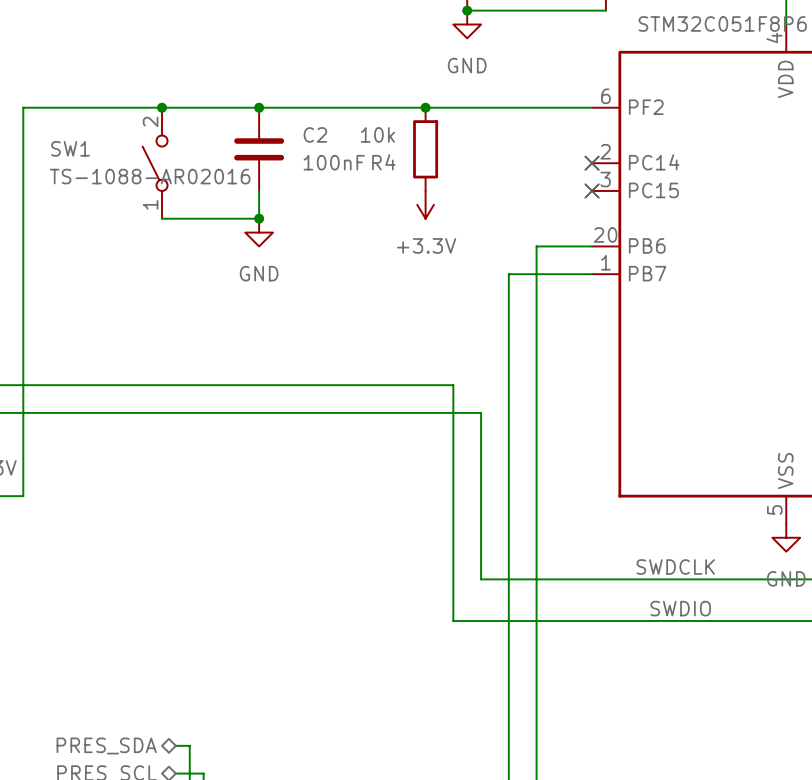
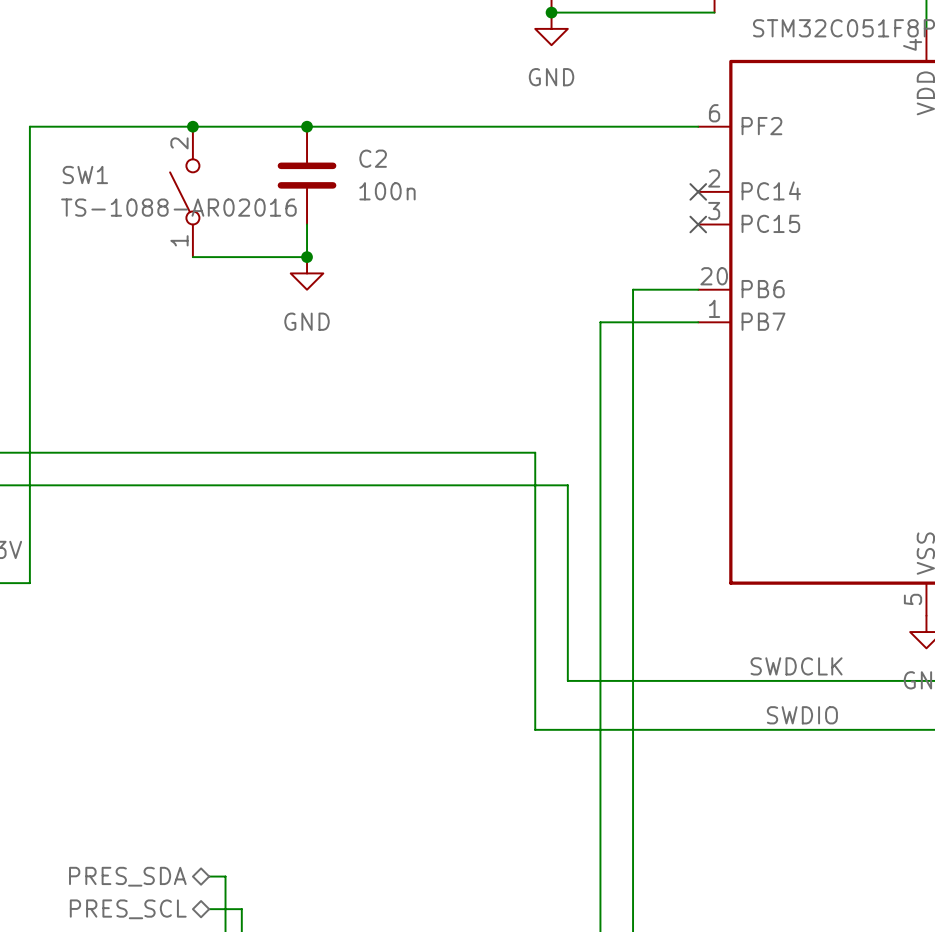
junction: (425, 107) -> none
R4: 10k (425, 149) -> none
C2 value: 100nF (334, 162) -> 100n (387, 191)
power symbol: +3.3V (425, 204) -> none

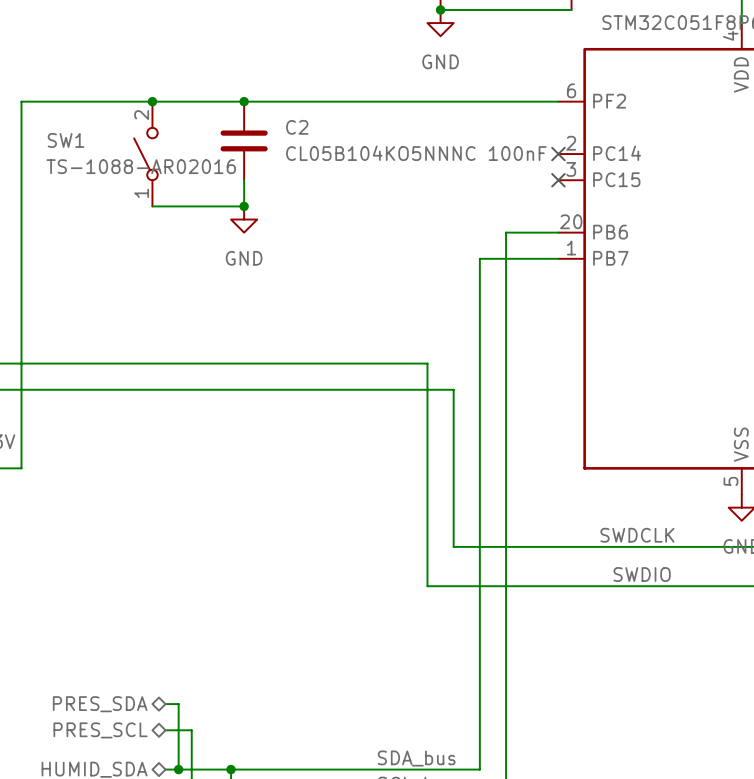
C2 value: 100n (387, 191) -> CL05B104KO5NNNC 100nF (416, 153)

